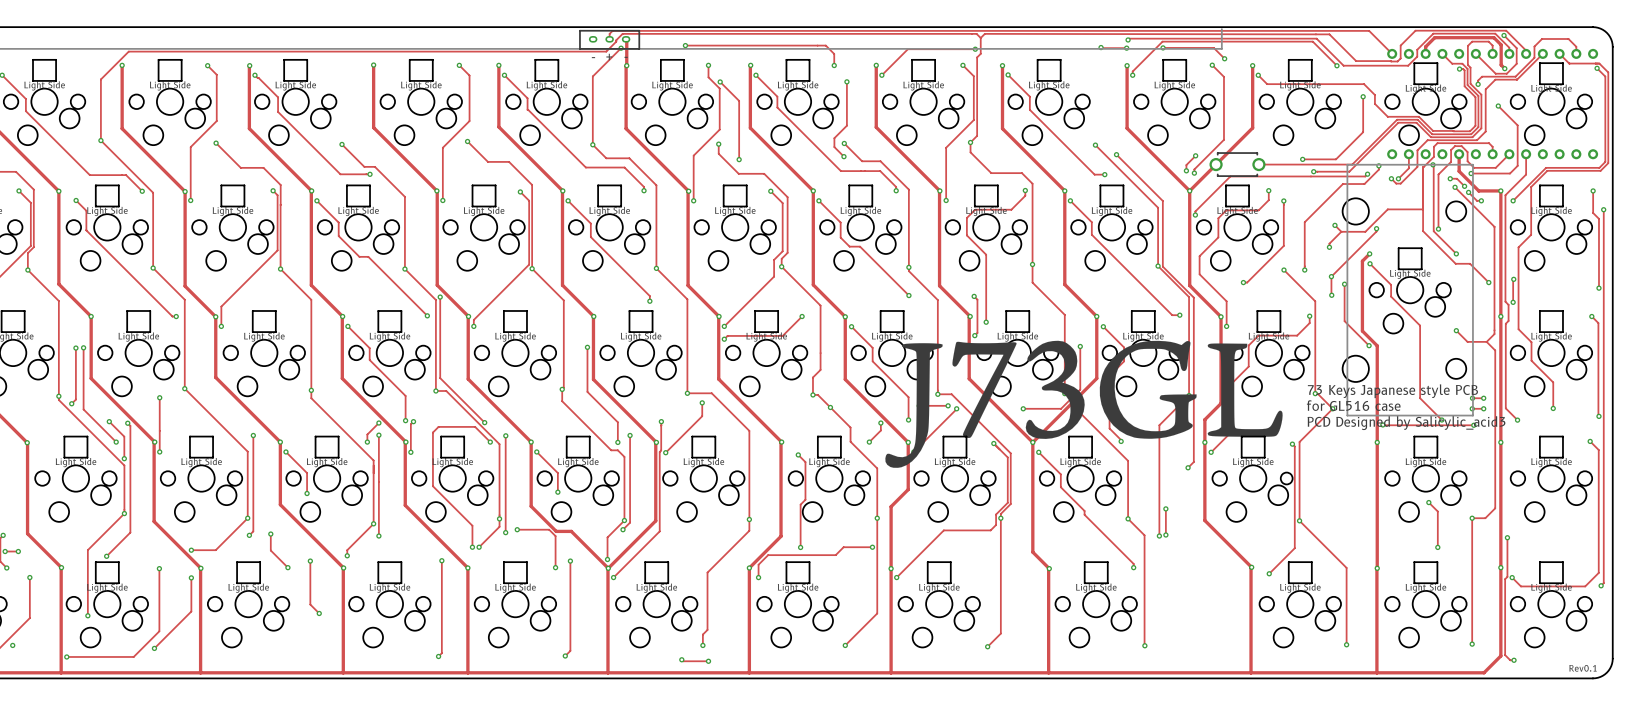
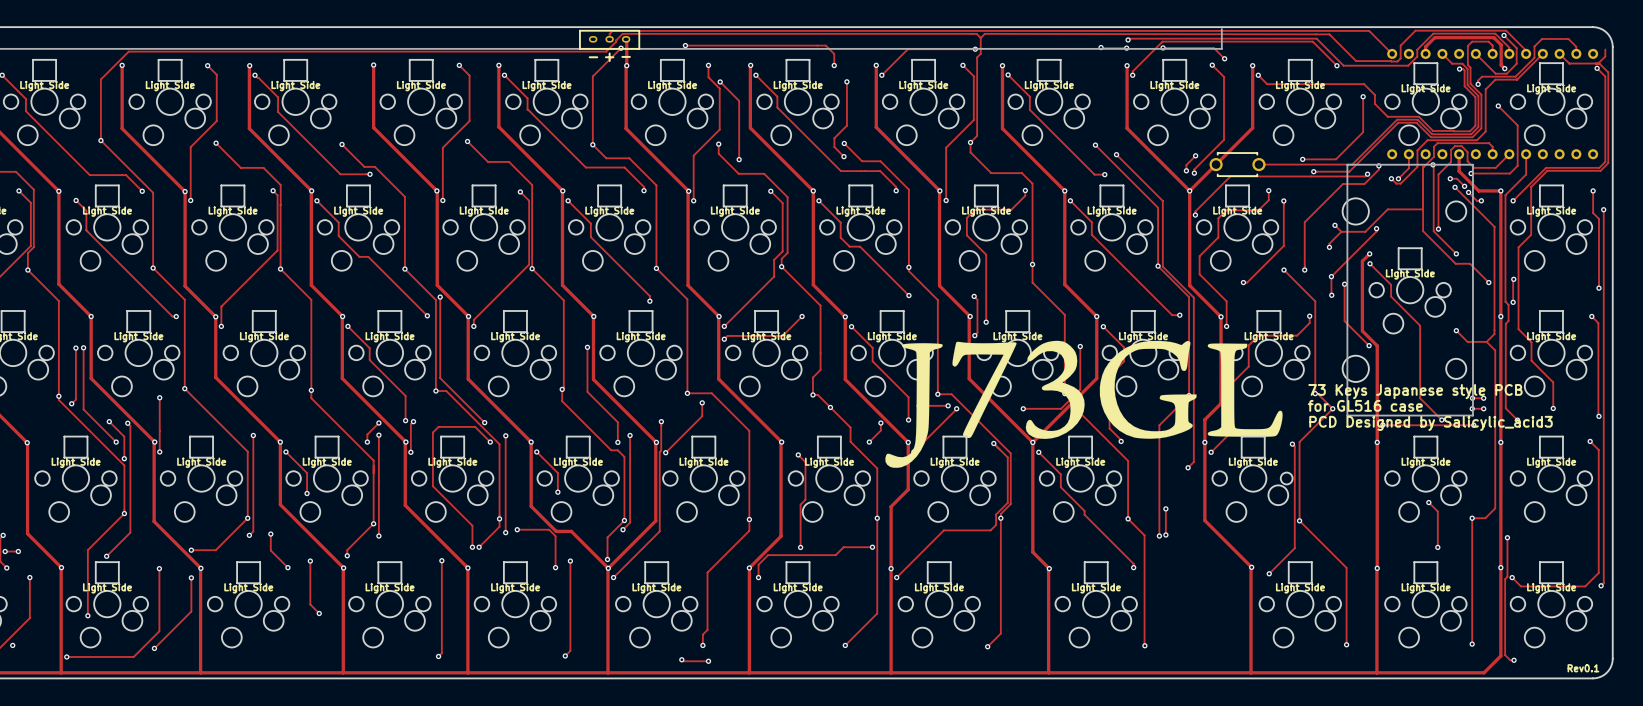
track: none -> (1605, 49) (1605, 56) (1598, 63)

